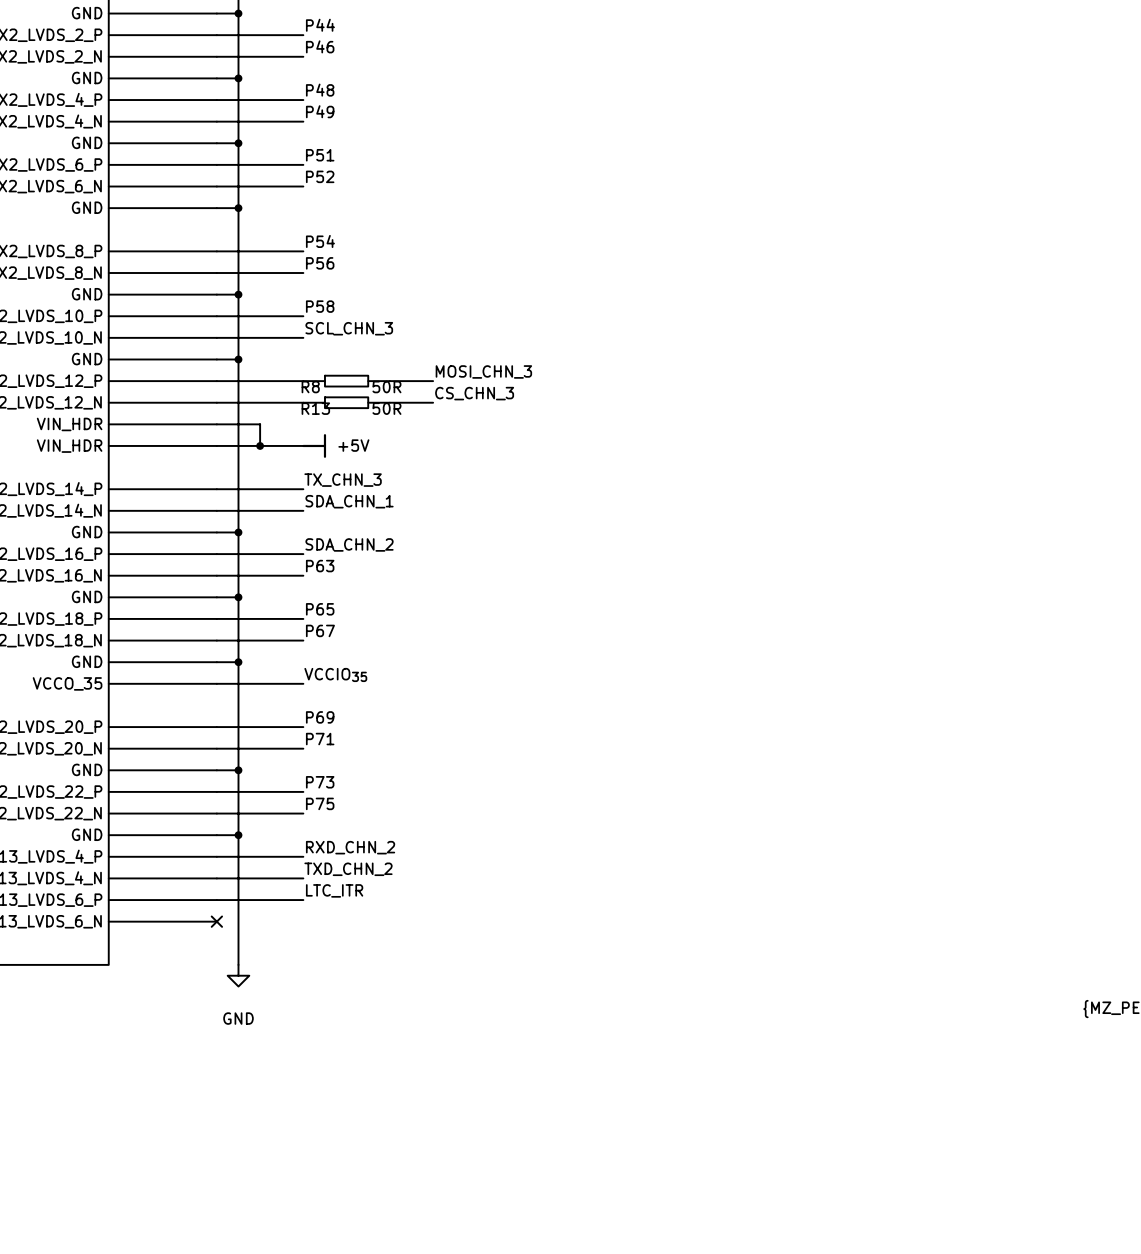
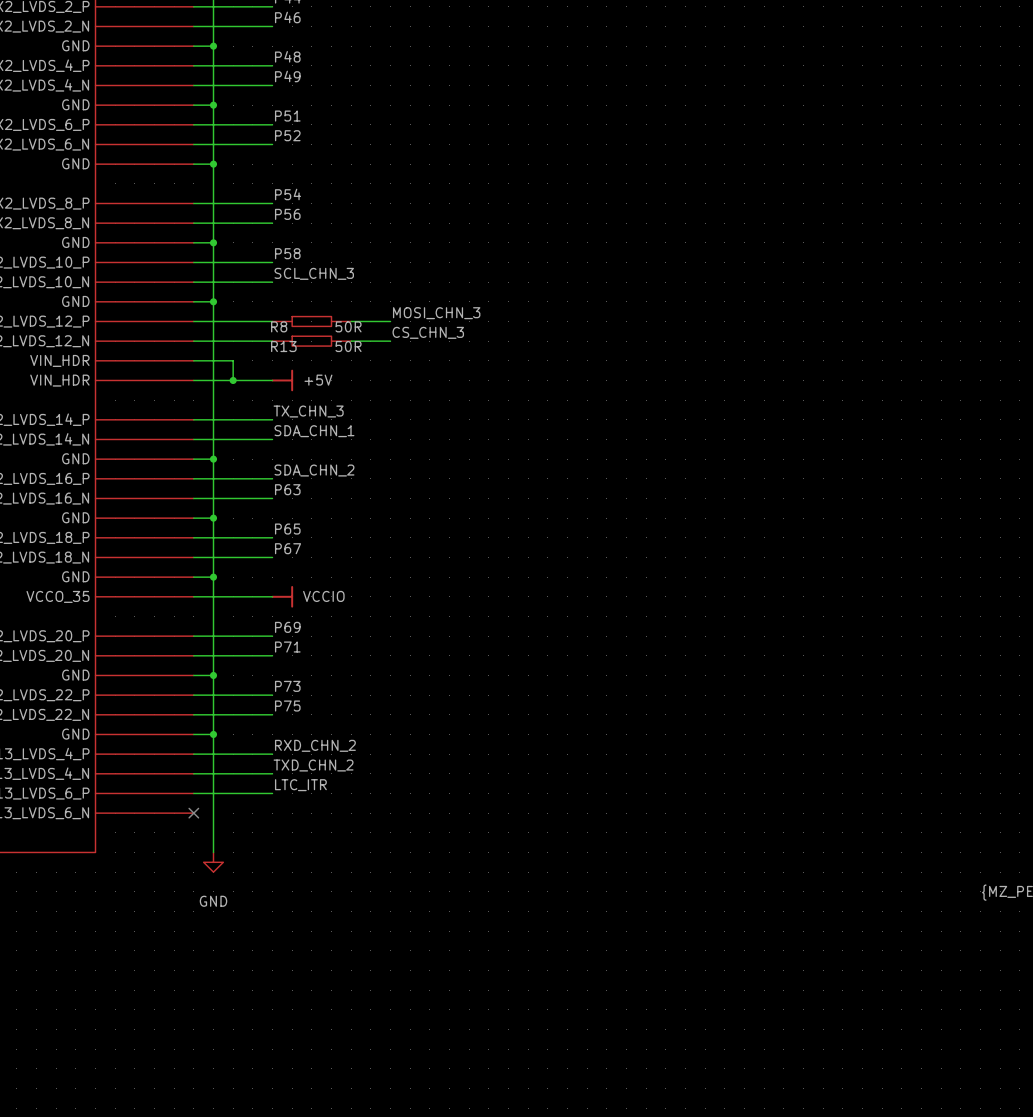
label: VCCIO35 (335, 674) -> none
power symbol: none -> VCCIO (282, 596)

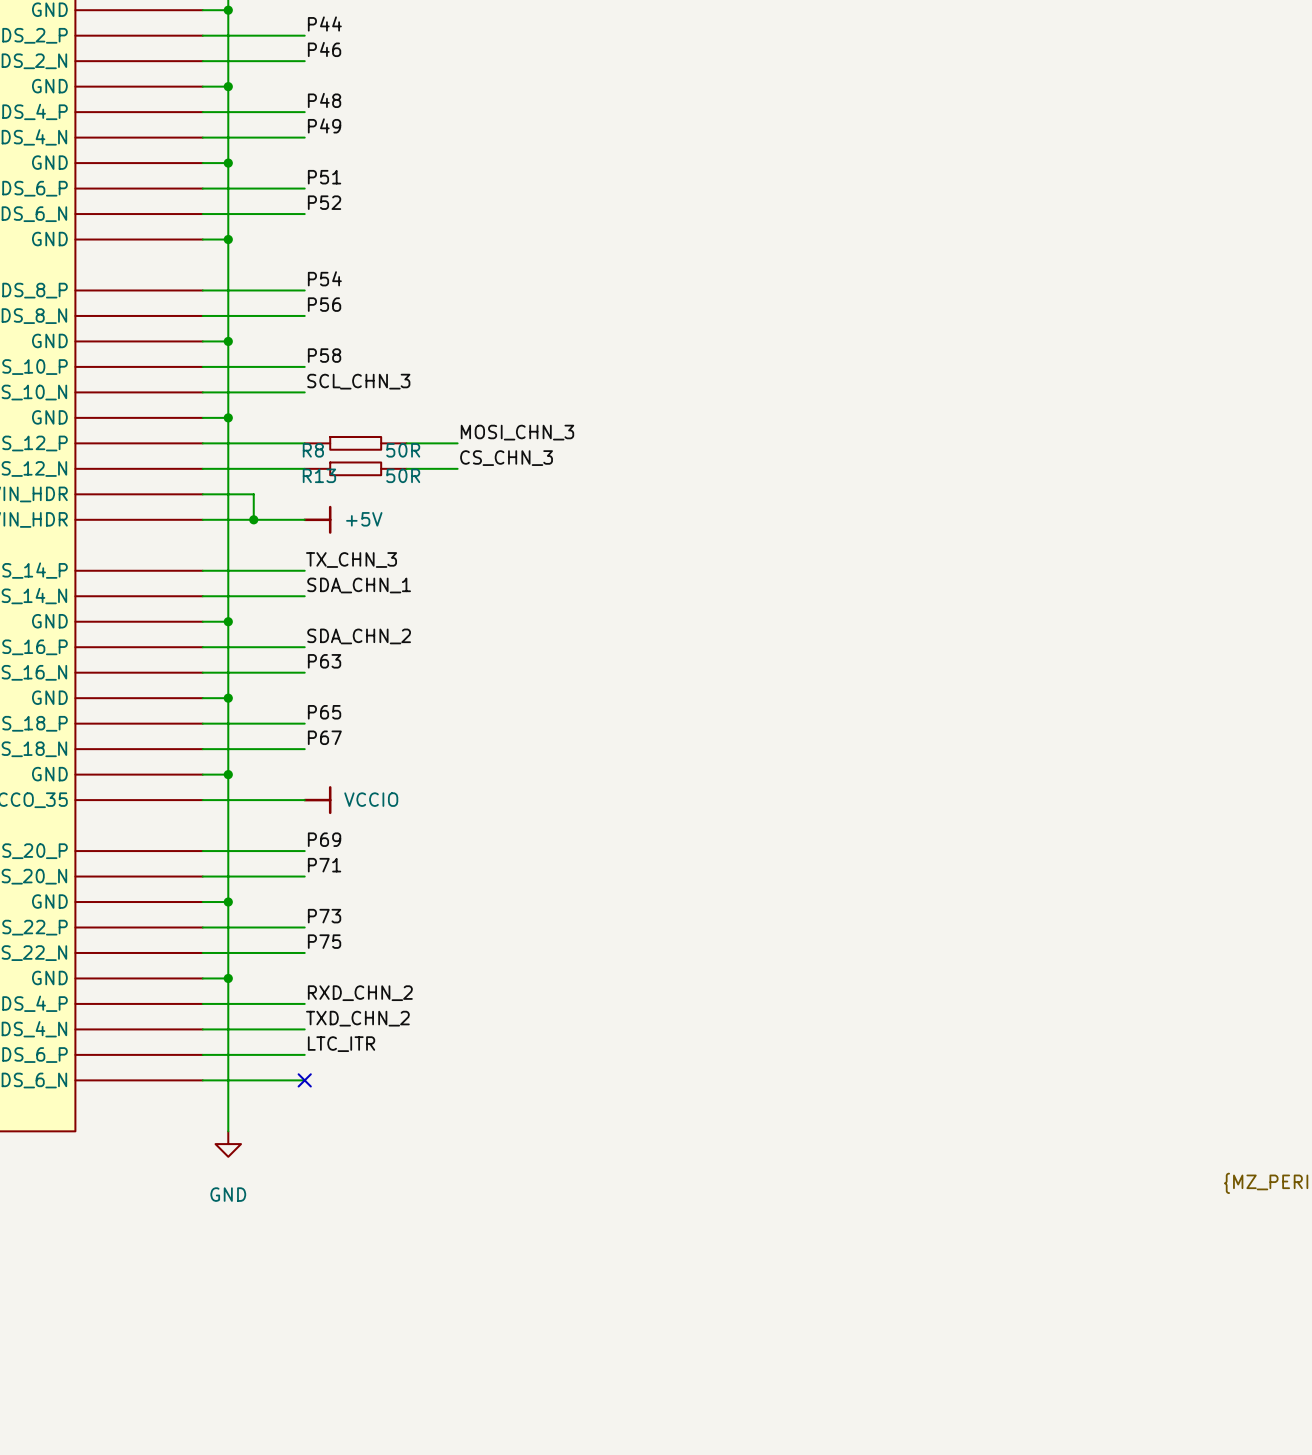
wire: none -> (202, 1080) (304, 1080)
no-connect mark: (193, 813) -> none
no-connect mark: none -> (304, 1080)

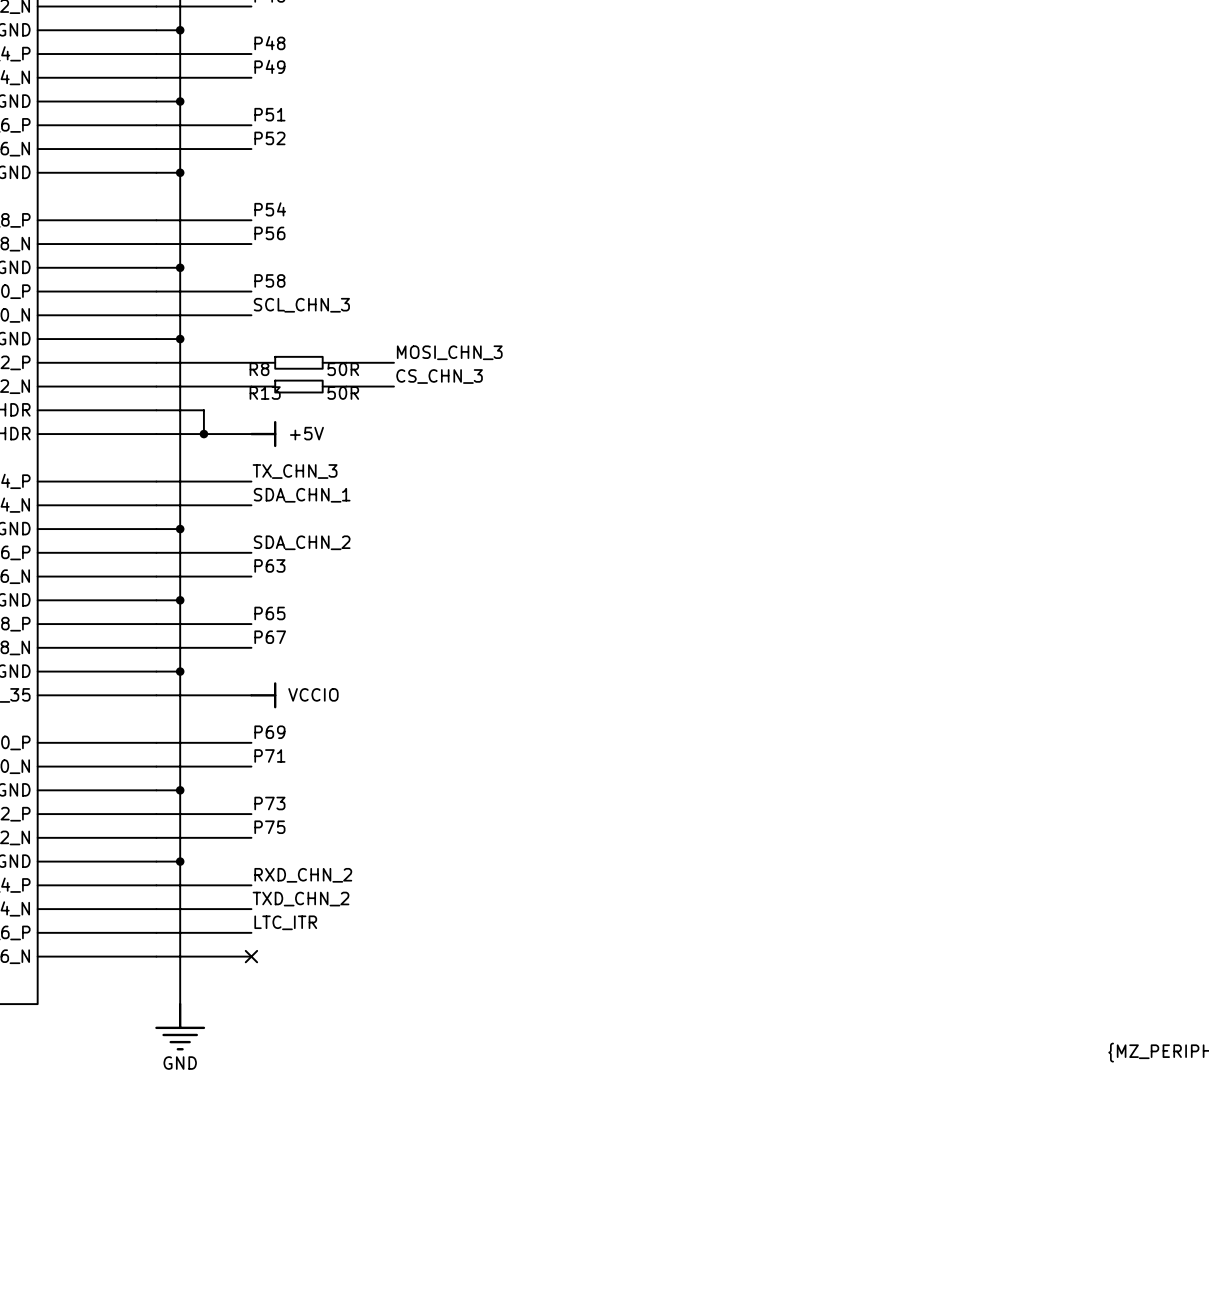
power symbol: GND (228, 1144) -> none
power symbol: none -> GND (180, 1026)

